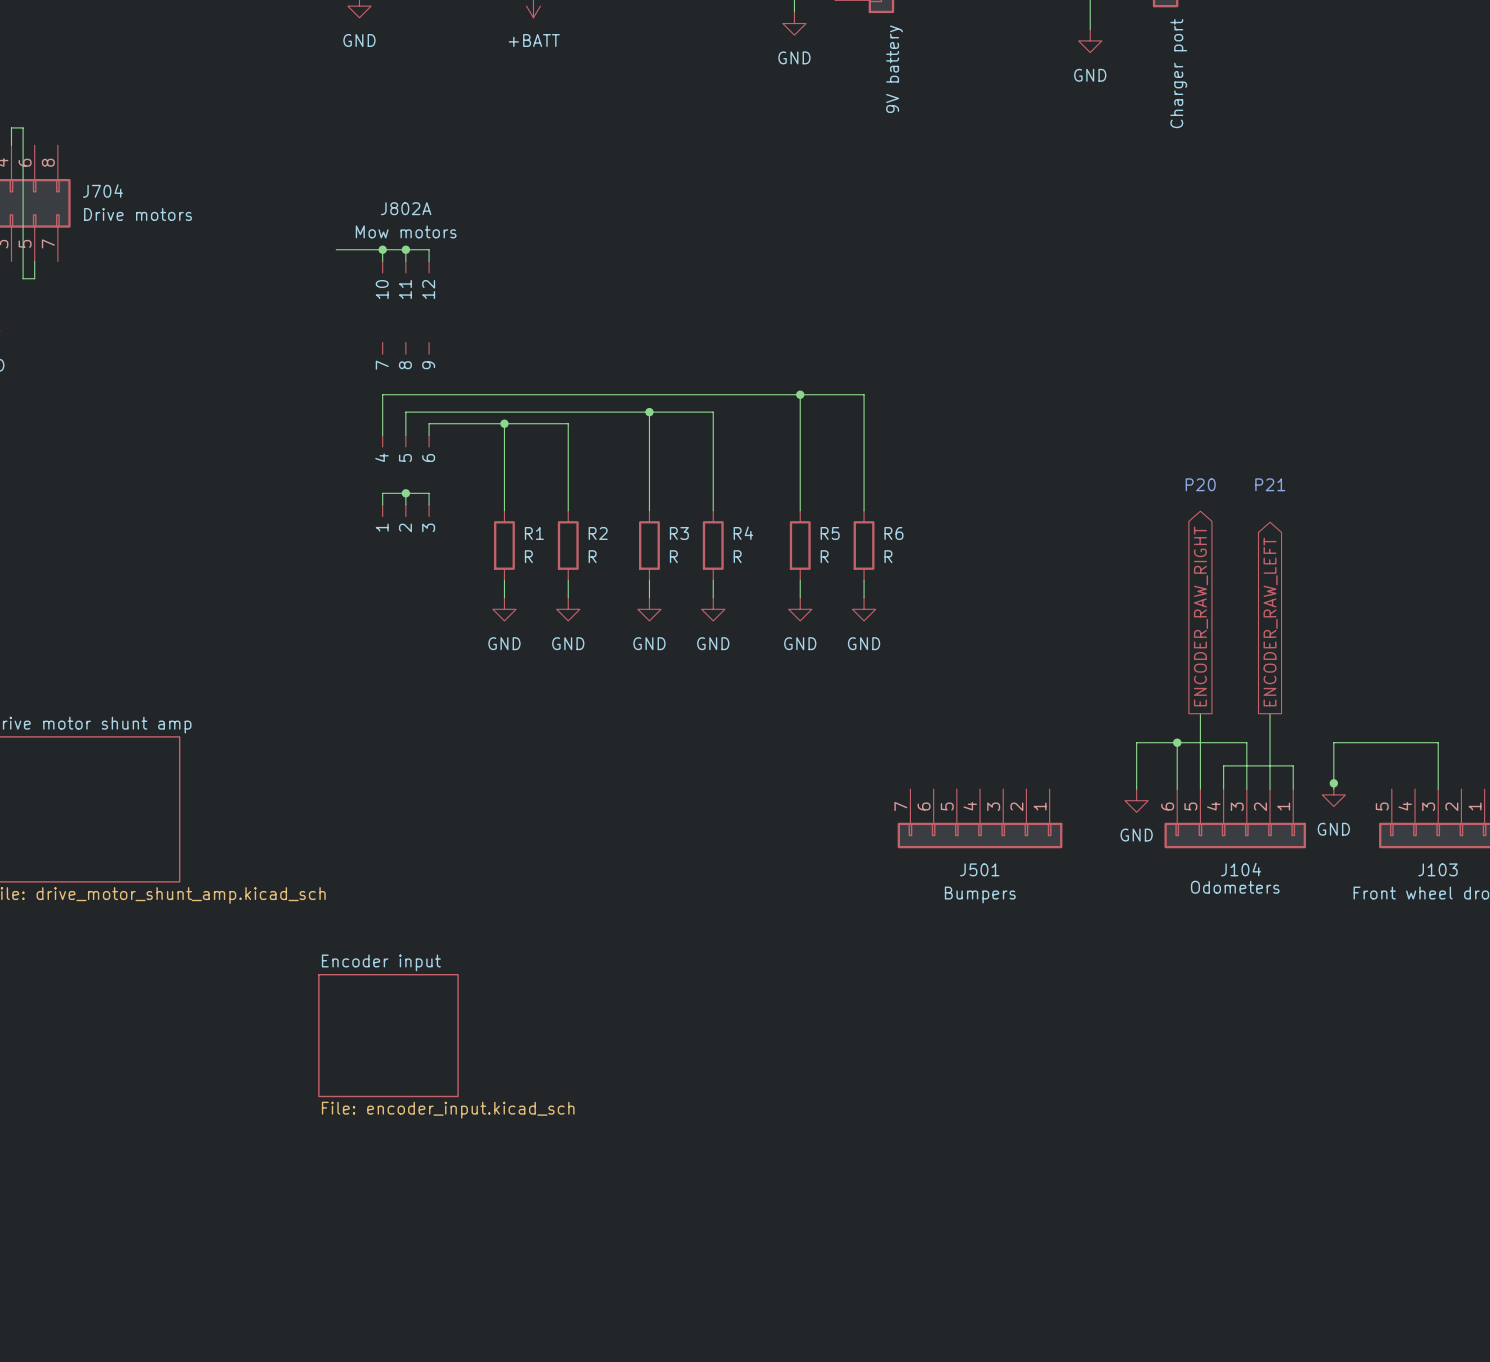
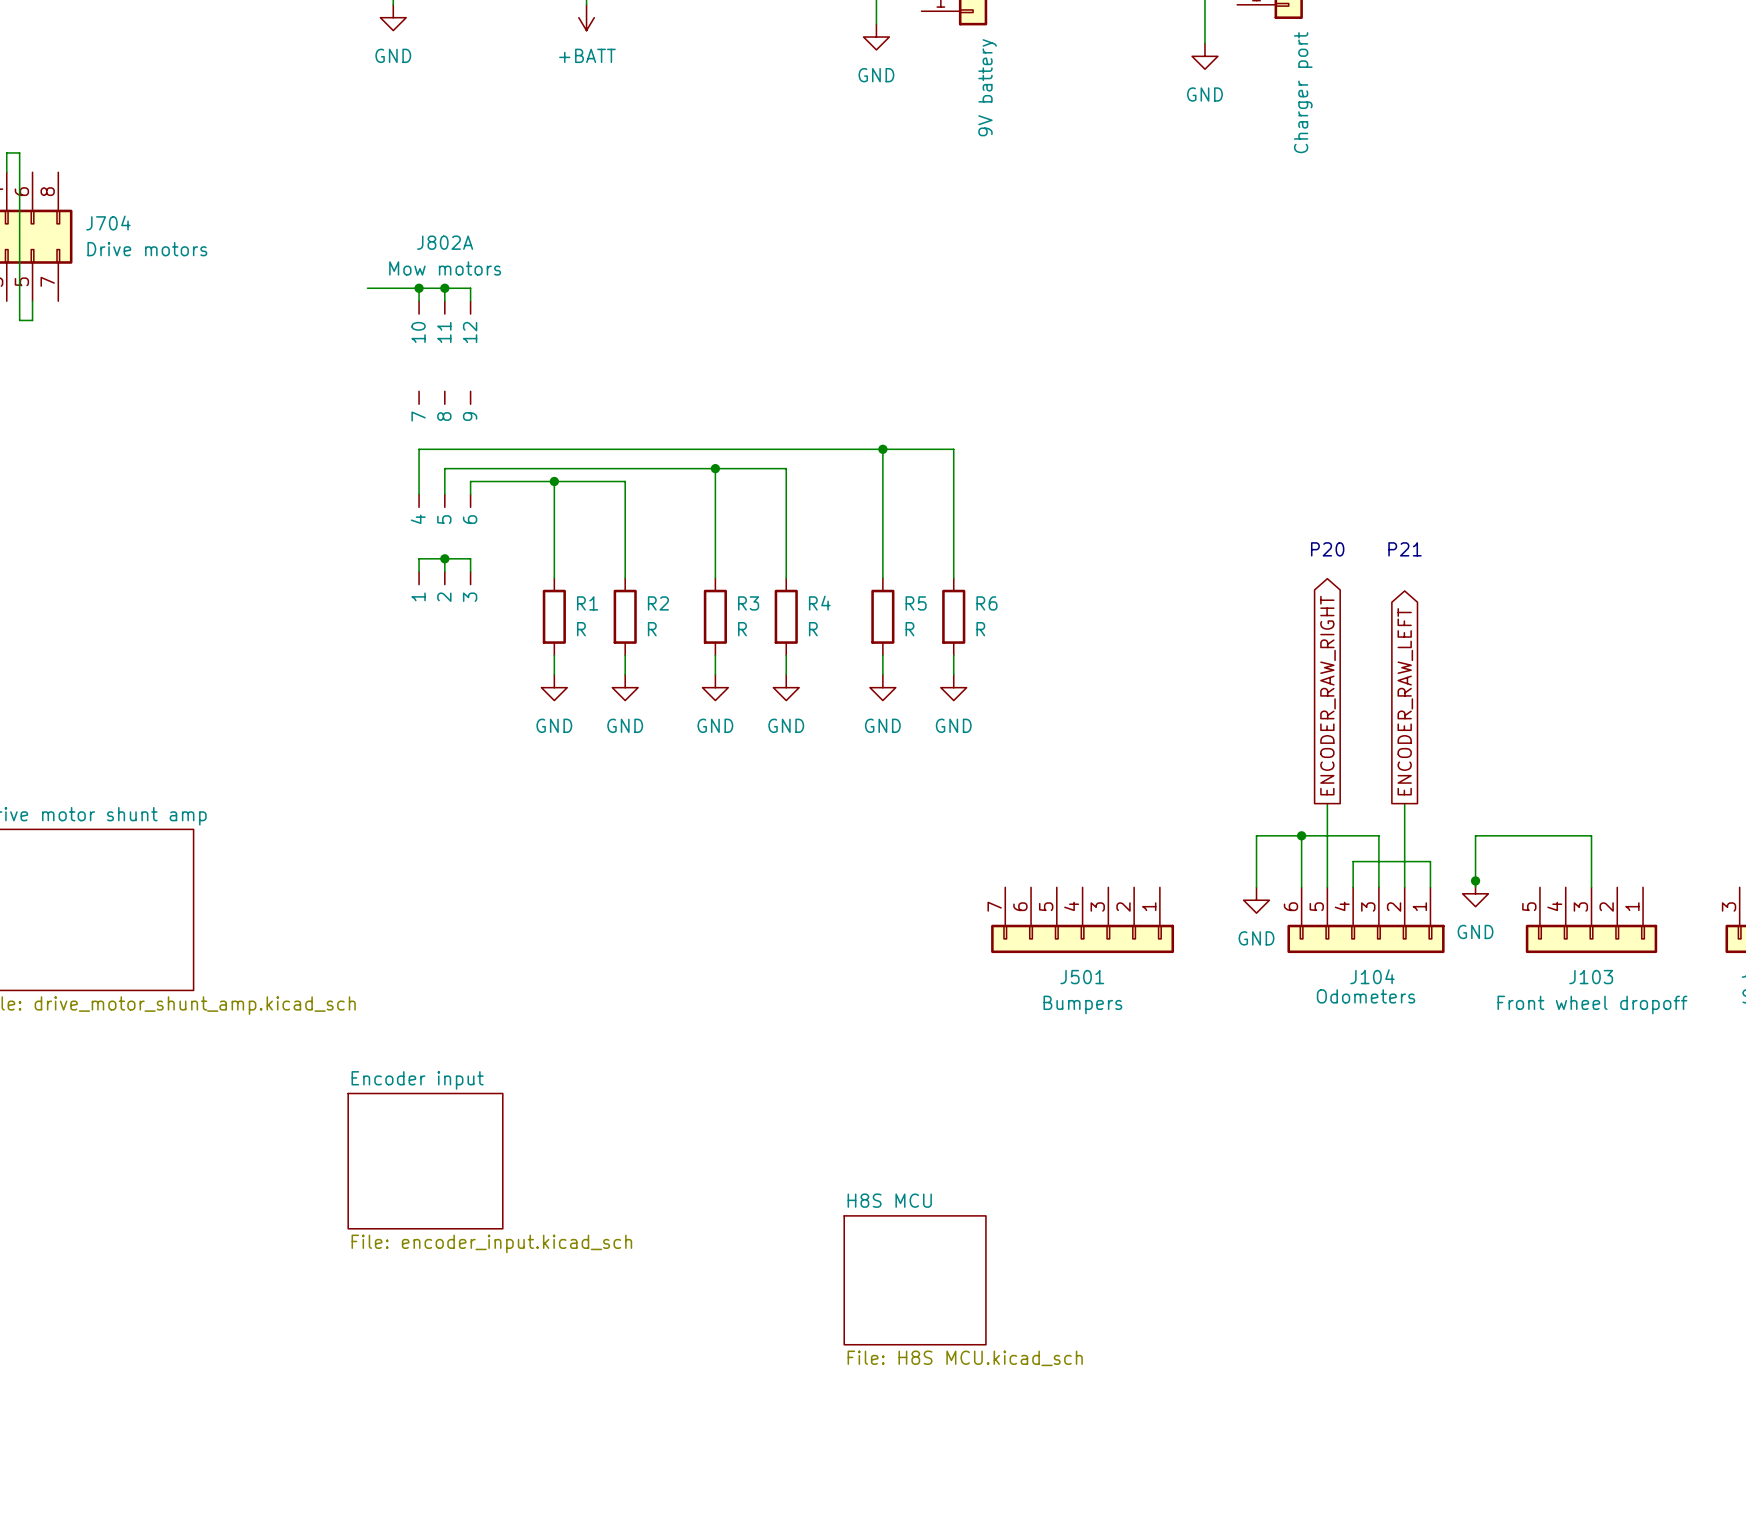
sheet H8S MCU: none -> File: H8S MCU.kicad_sch (915, 1280)

